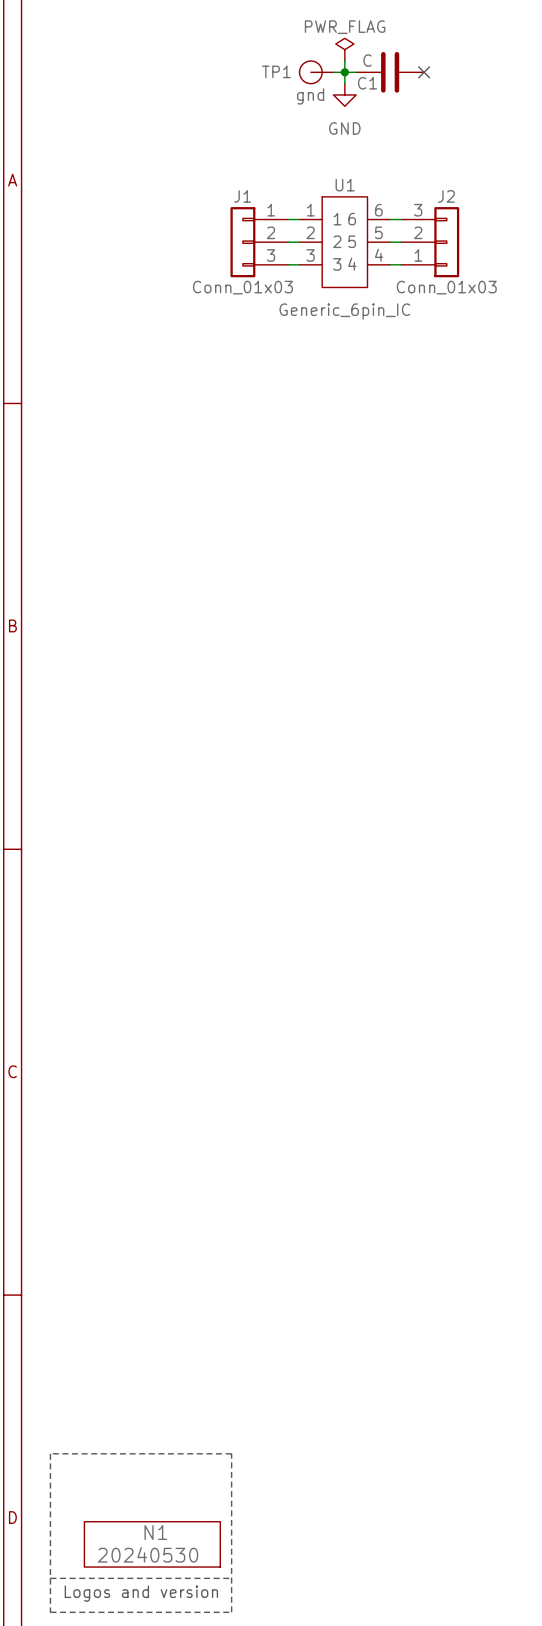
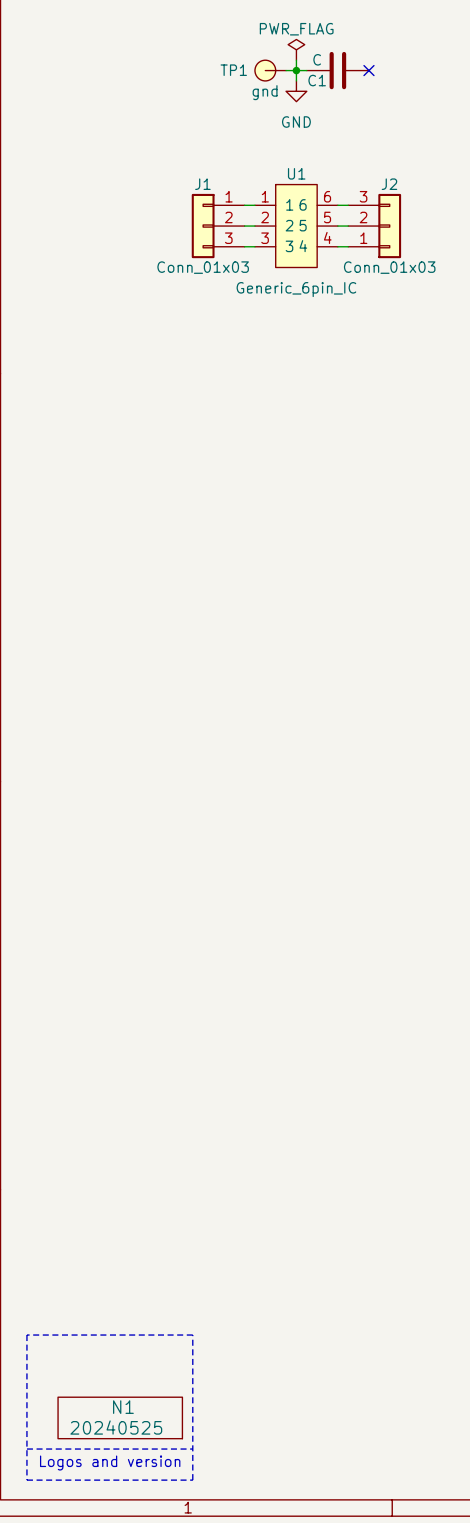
N1 value: 20240530 (148, 1554) -> 20240525 (116, 1427)

